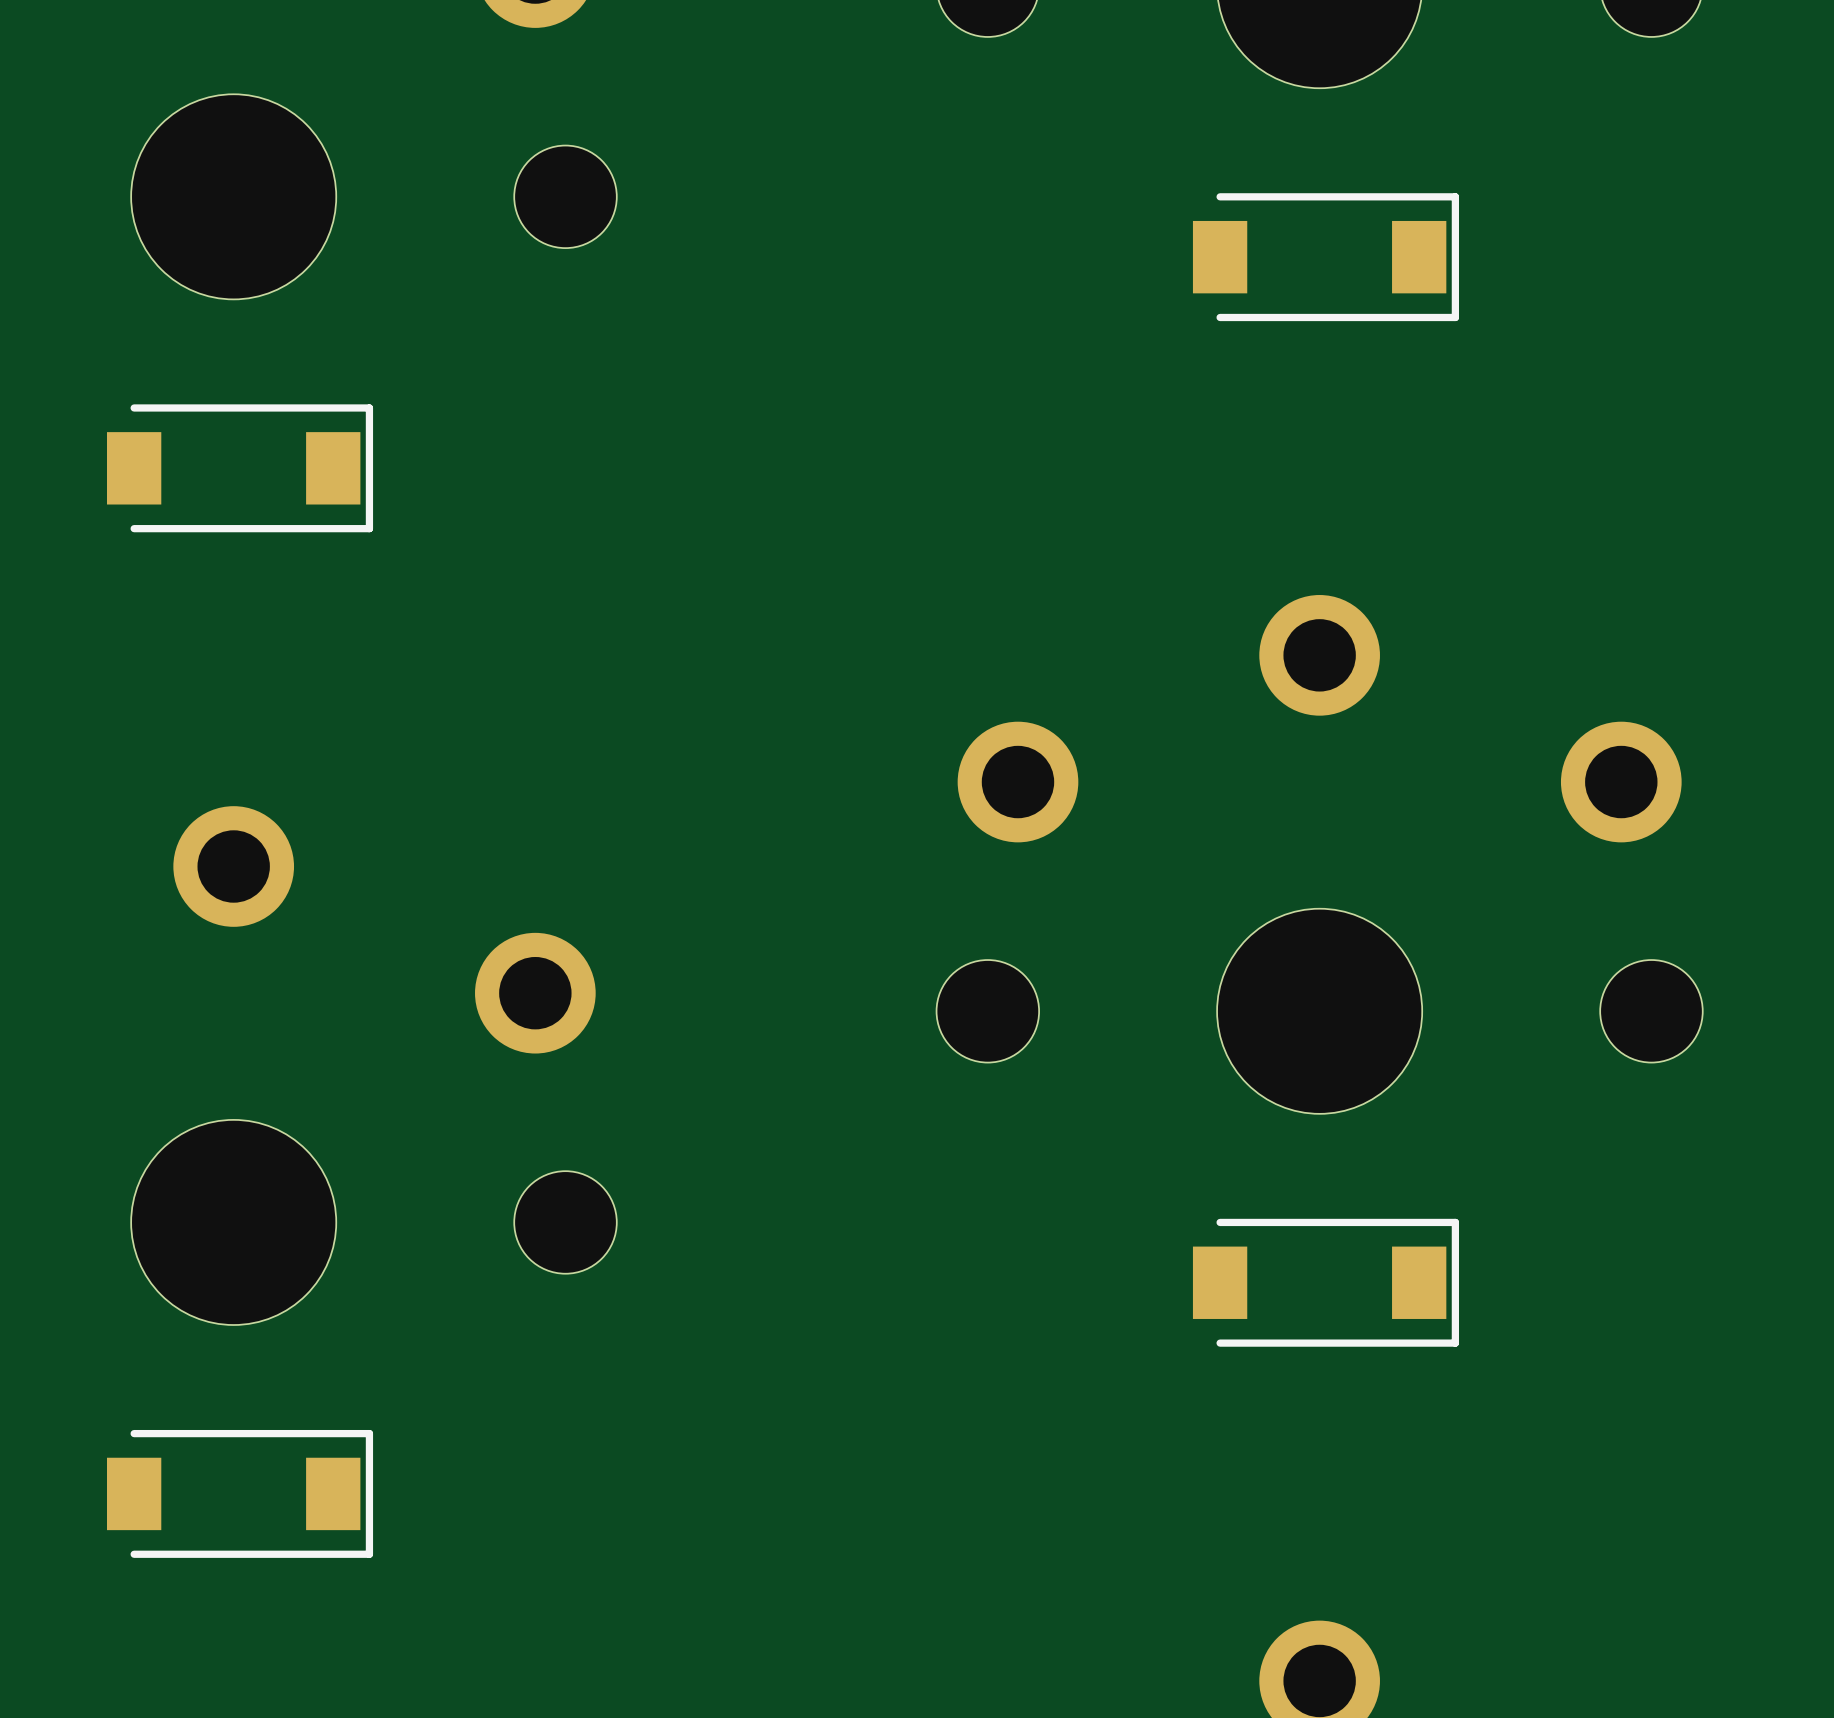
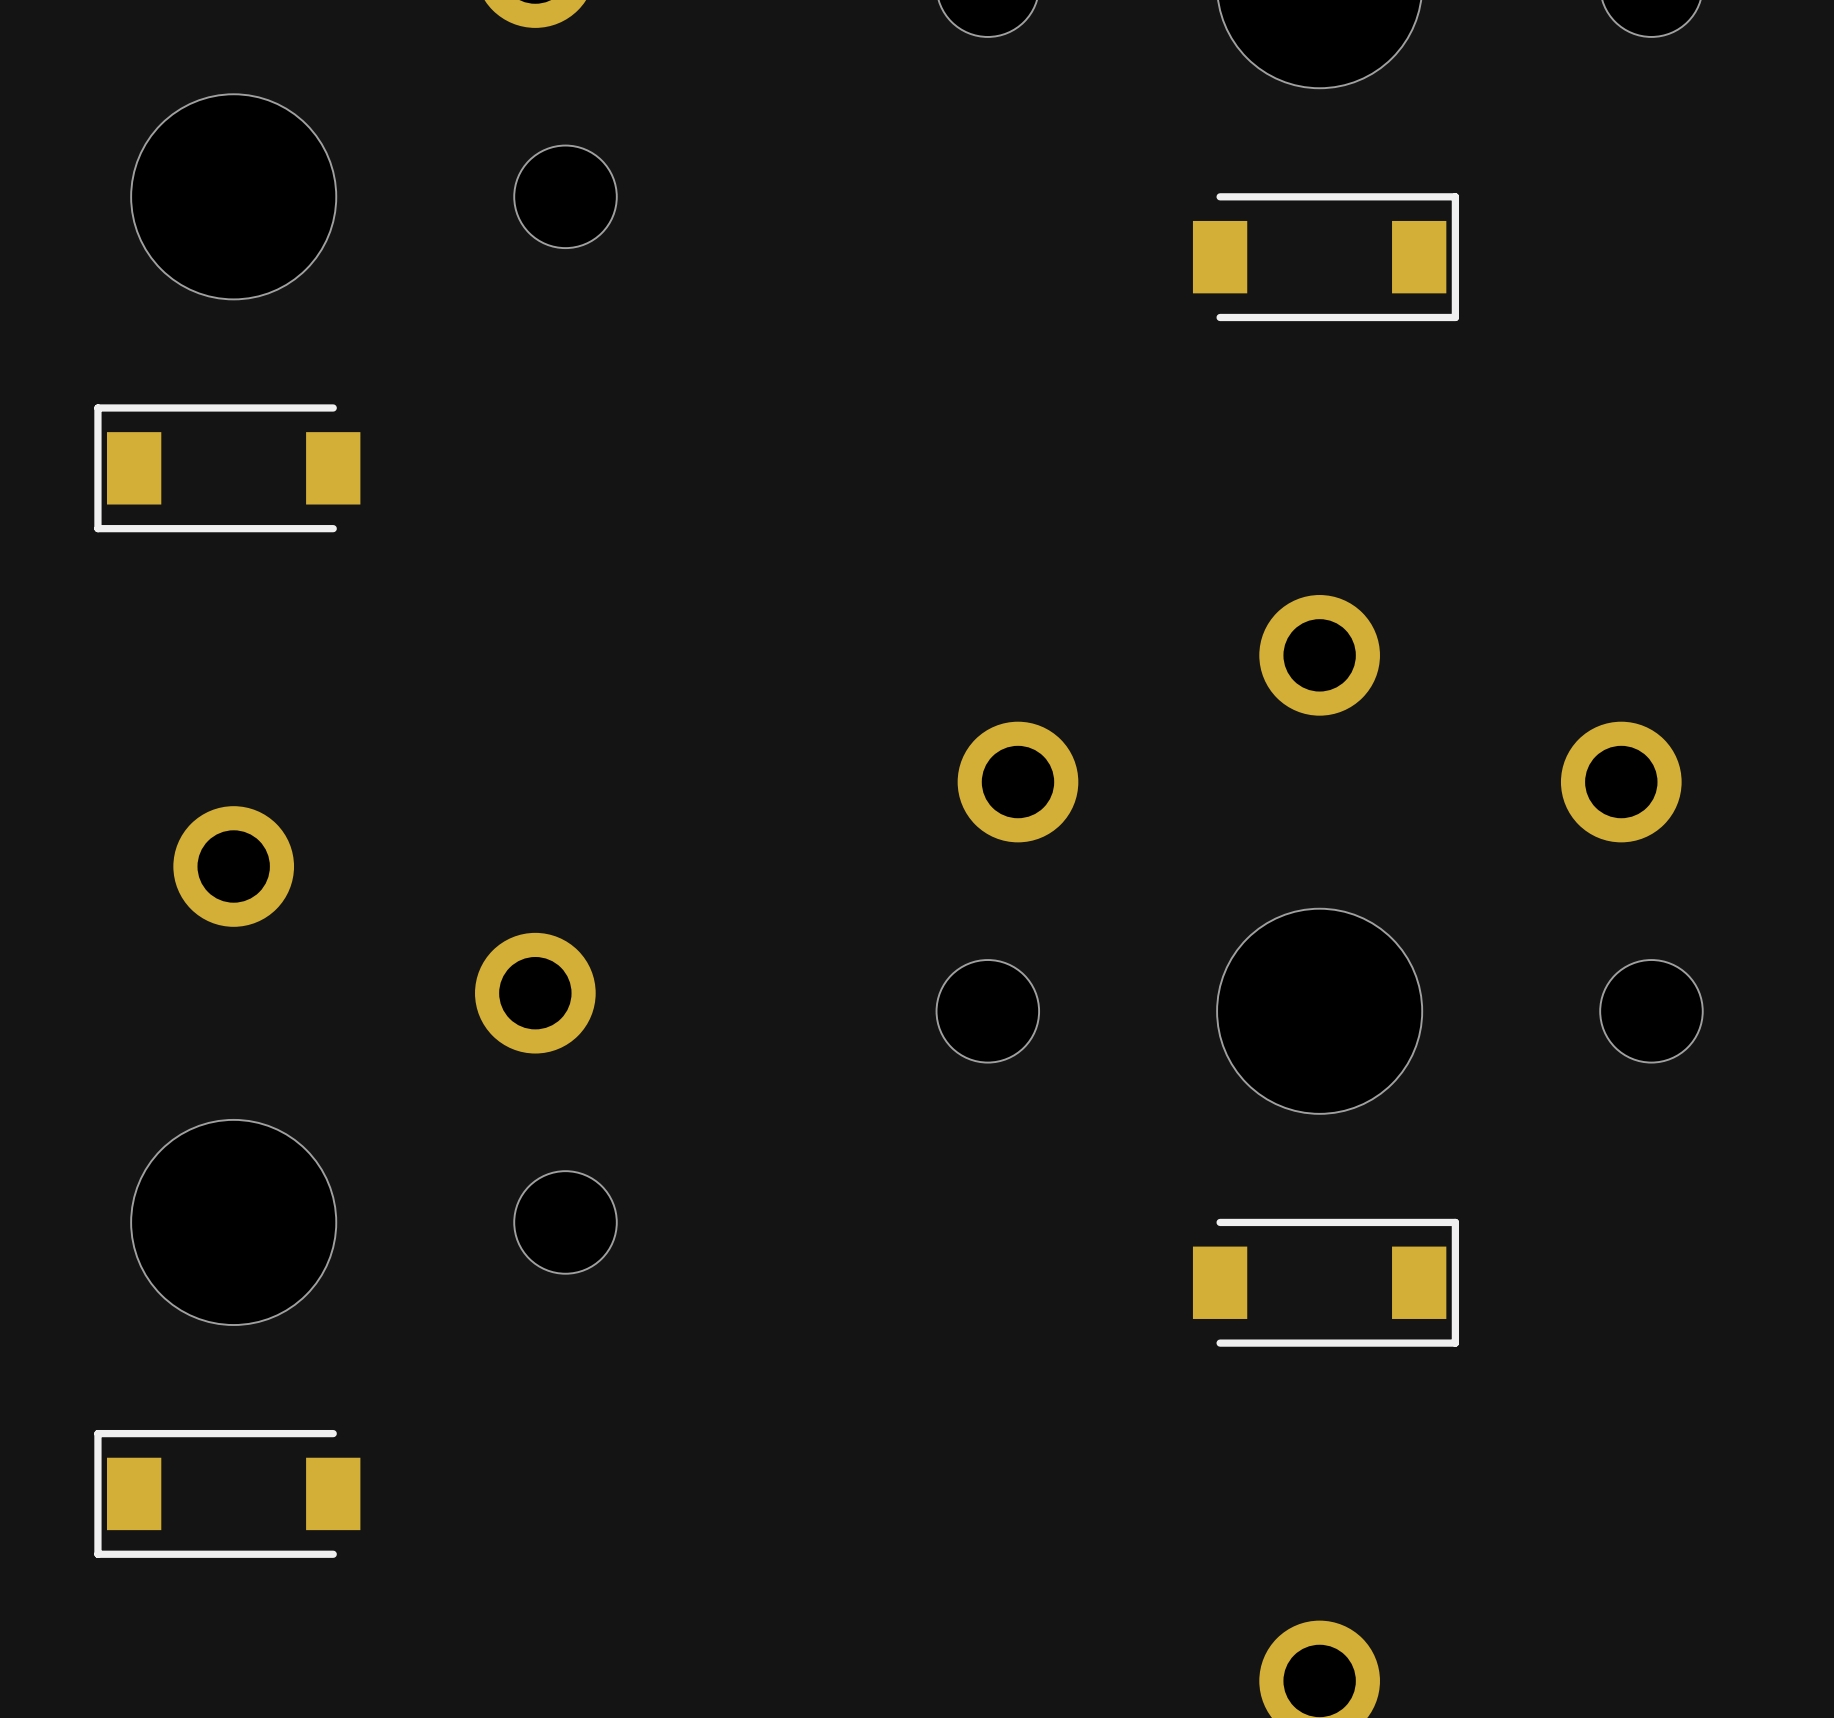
part rotation: 0° (240, 468) -> 180° (227, 468)
part rotation: 0° (240, 1493) -> 180° (227, 1493)

